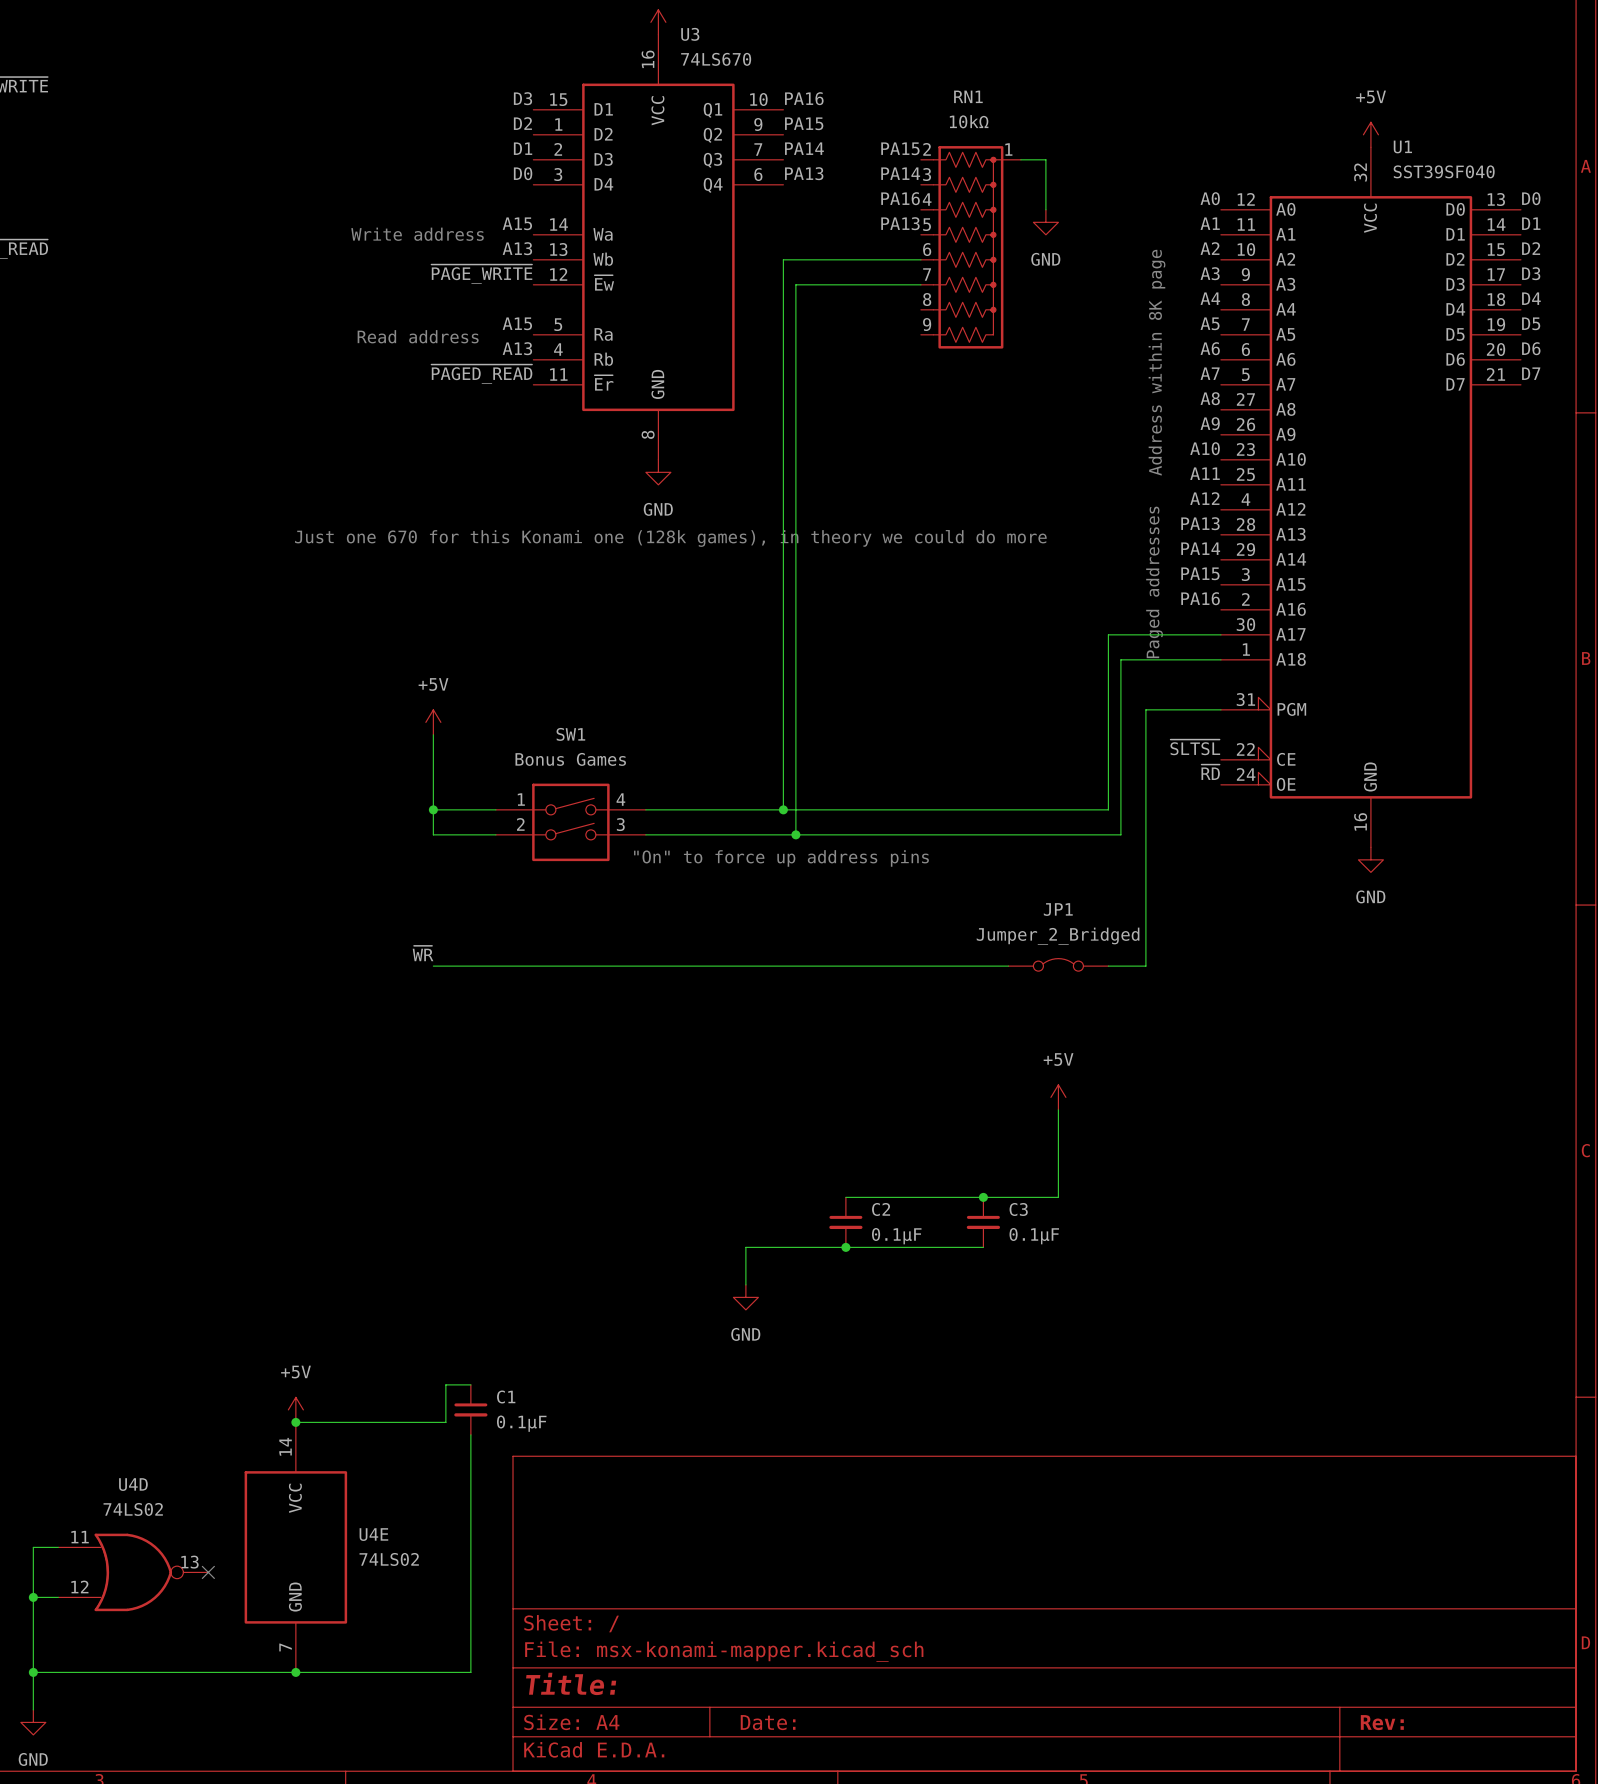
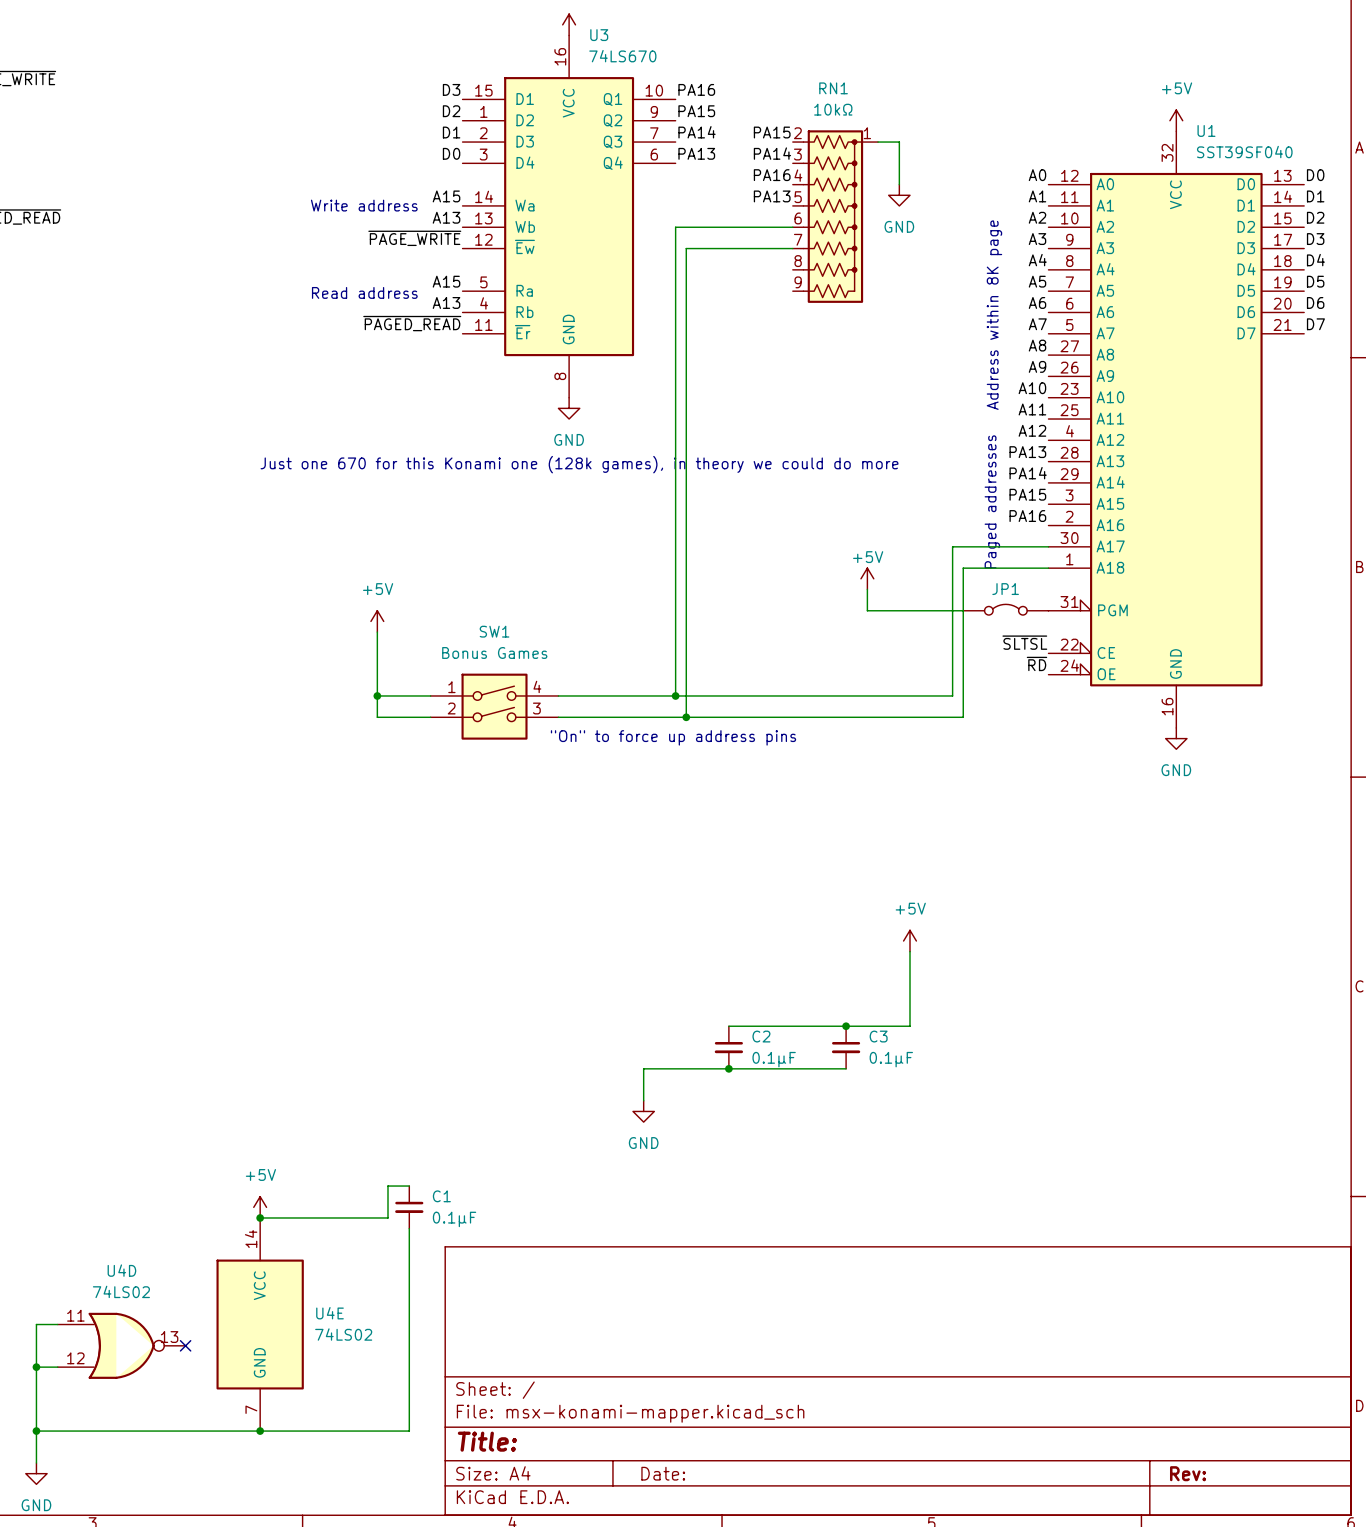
power symbol: none -> +5V (867, 578)
wire: none -> (867, 589) (867, 610) (963, 610)
wire: (1220, 709) (1145, 709) (1145, 966) (1108, 966) -> none
JP1 name position: JP1 (1058, 909) -> JP1 (1005, 589)
JP1 value: Jumper_2_Bridged (1058, 936) -> none
label: ~{WR} (423, 953) -> none
JP1 position: (1058, 964) -> (1005, 609)
wire: (433, 966) (1008, 966) -> none

